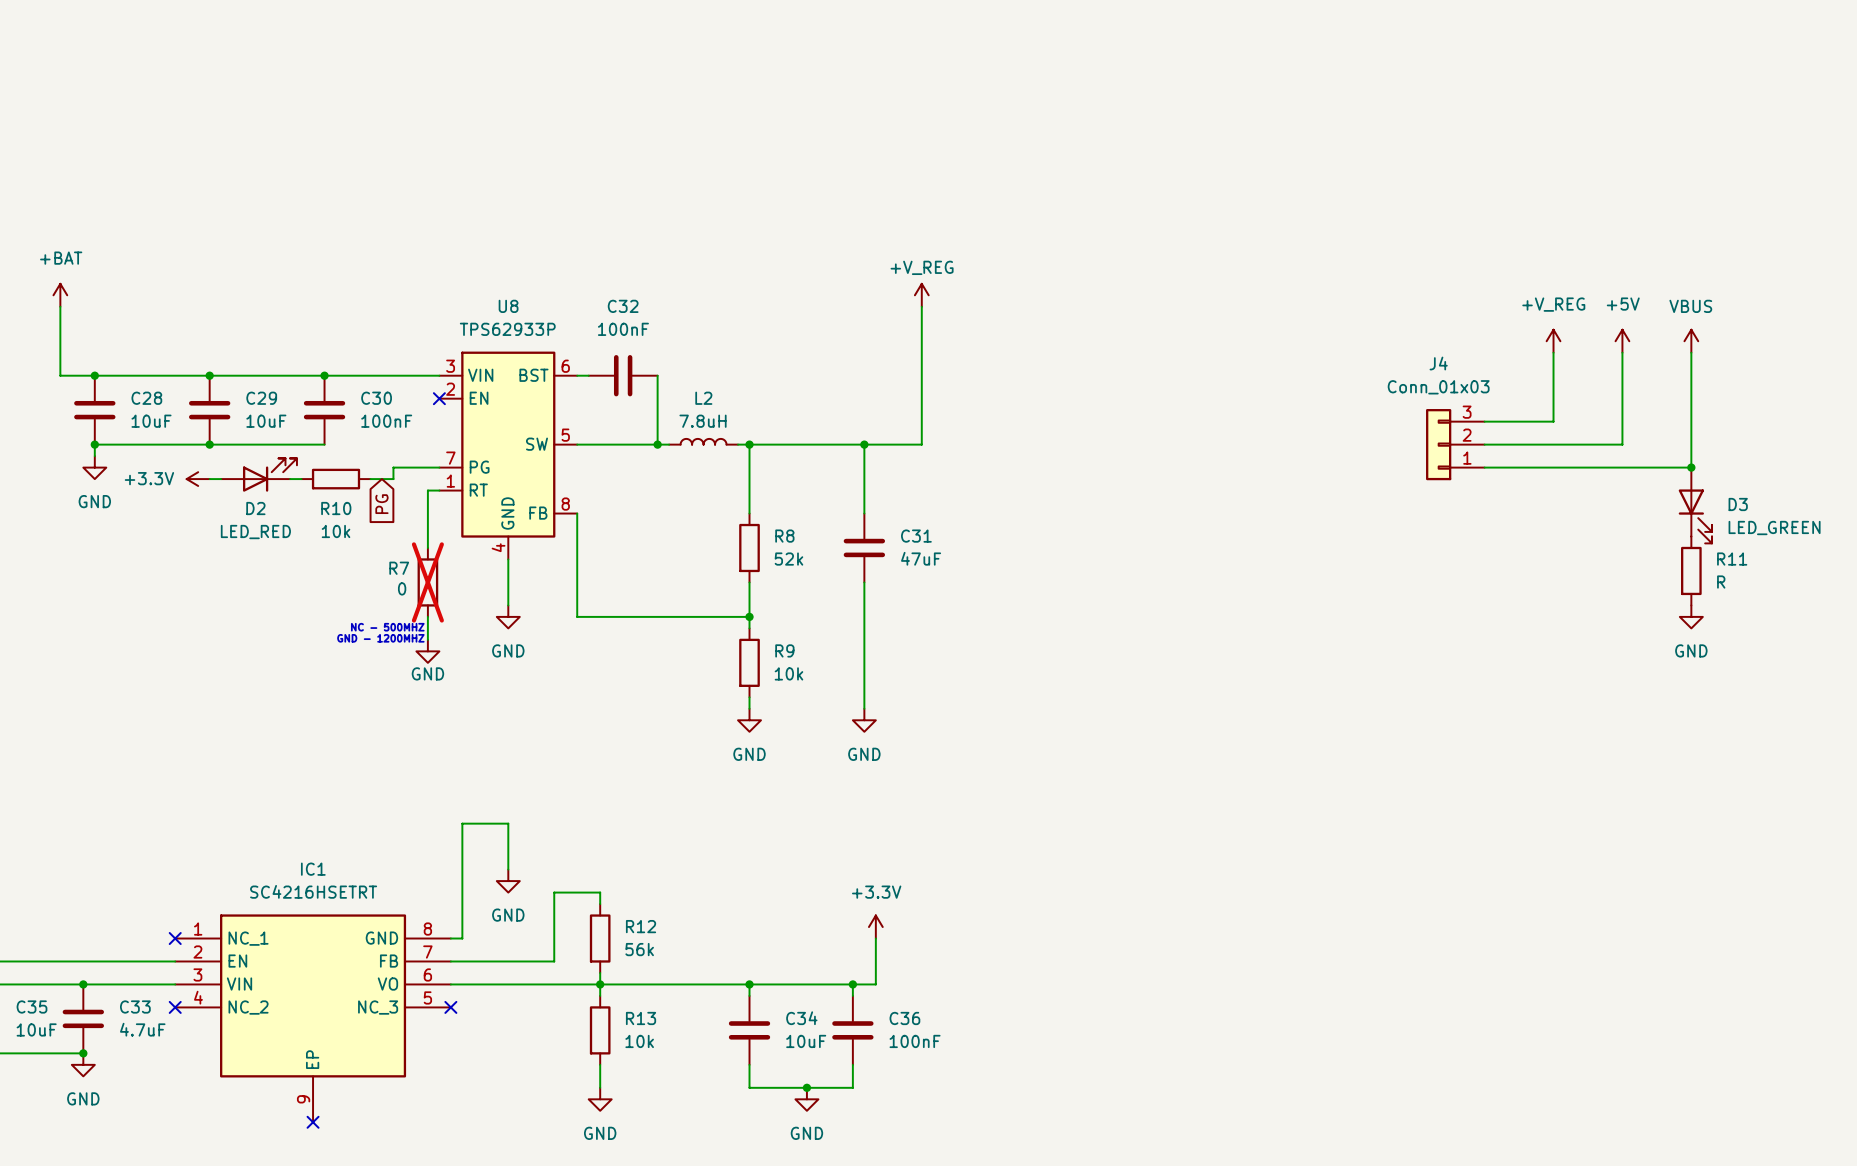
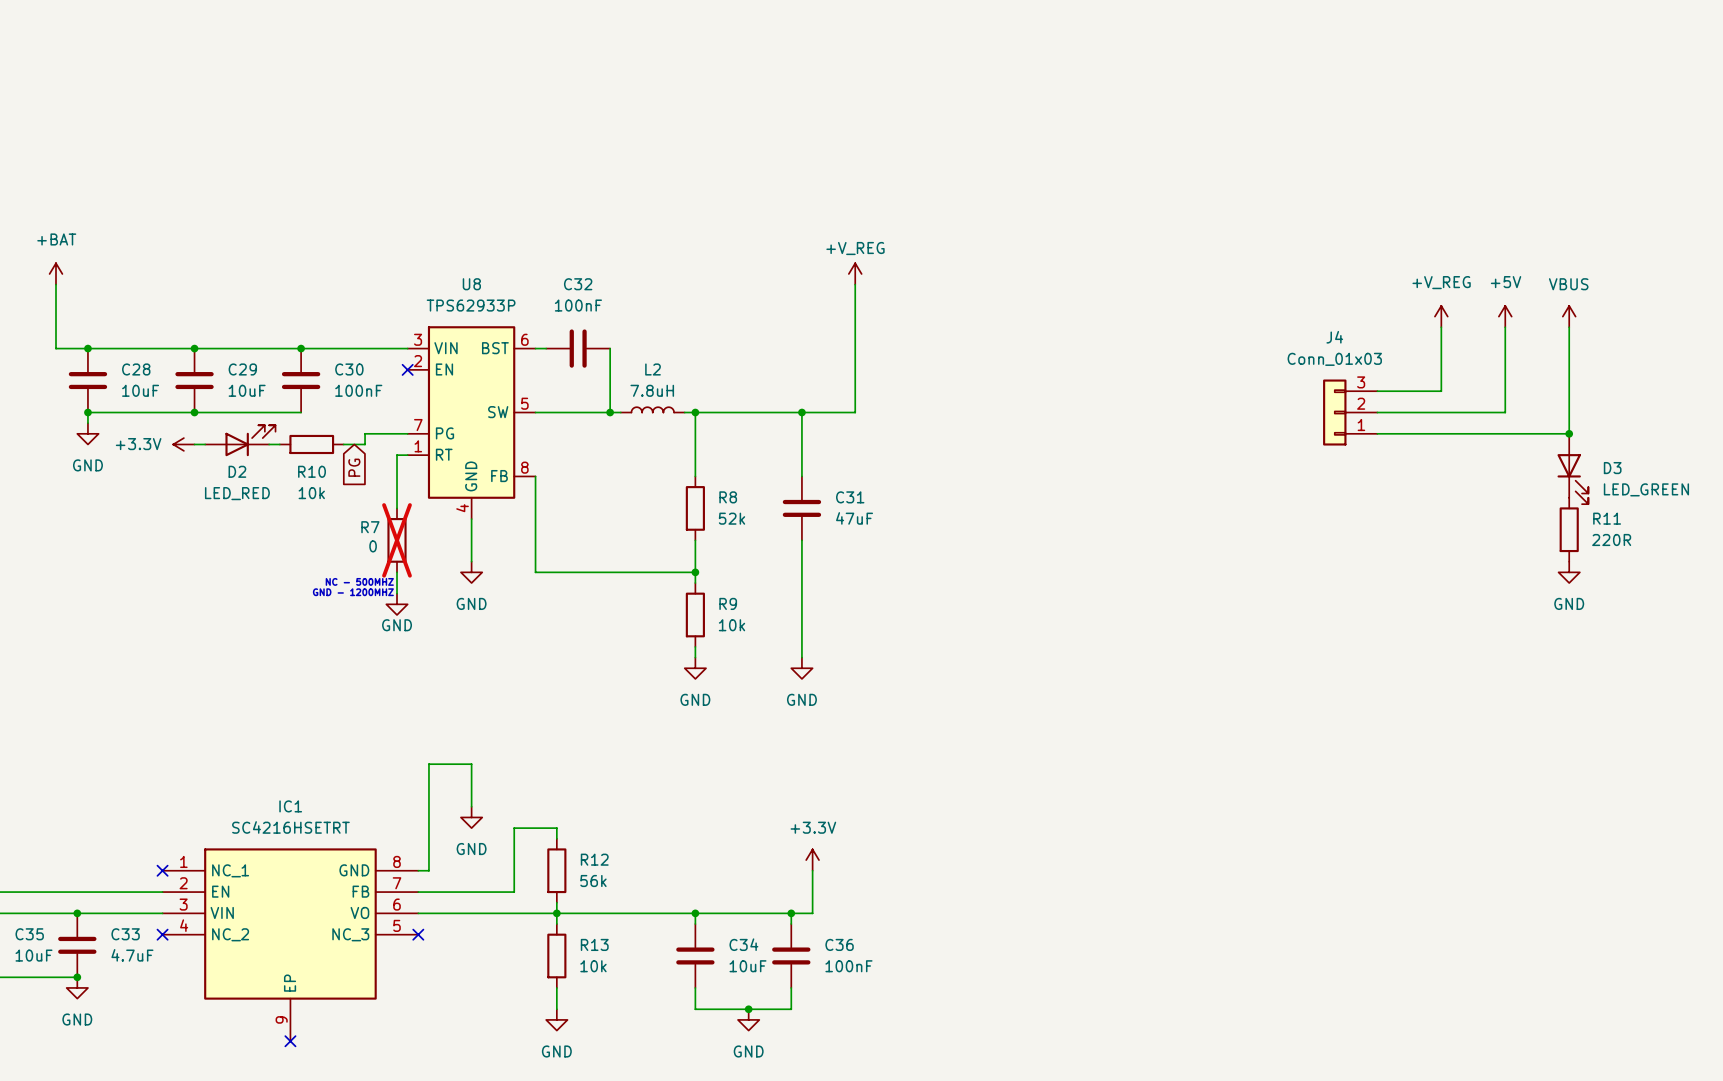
R11 value: R (1721, 582) -> 220R (1611, 539)

